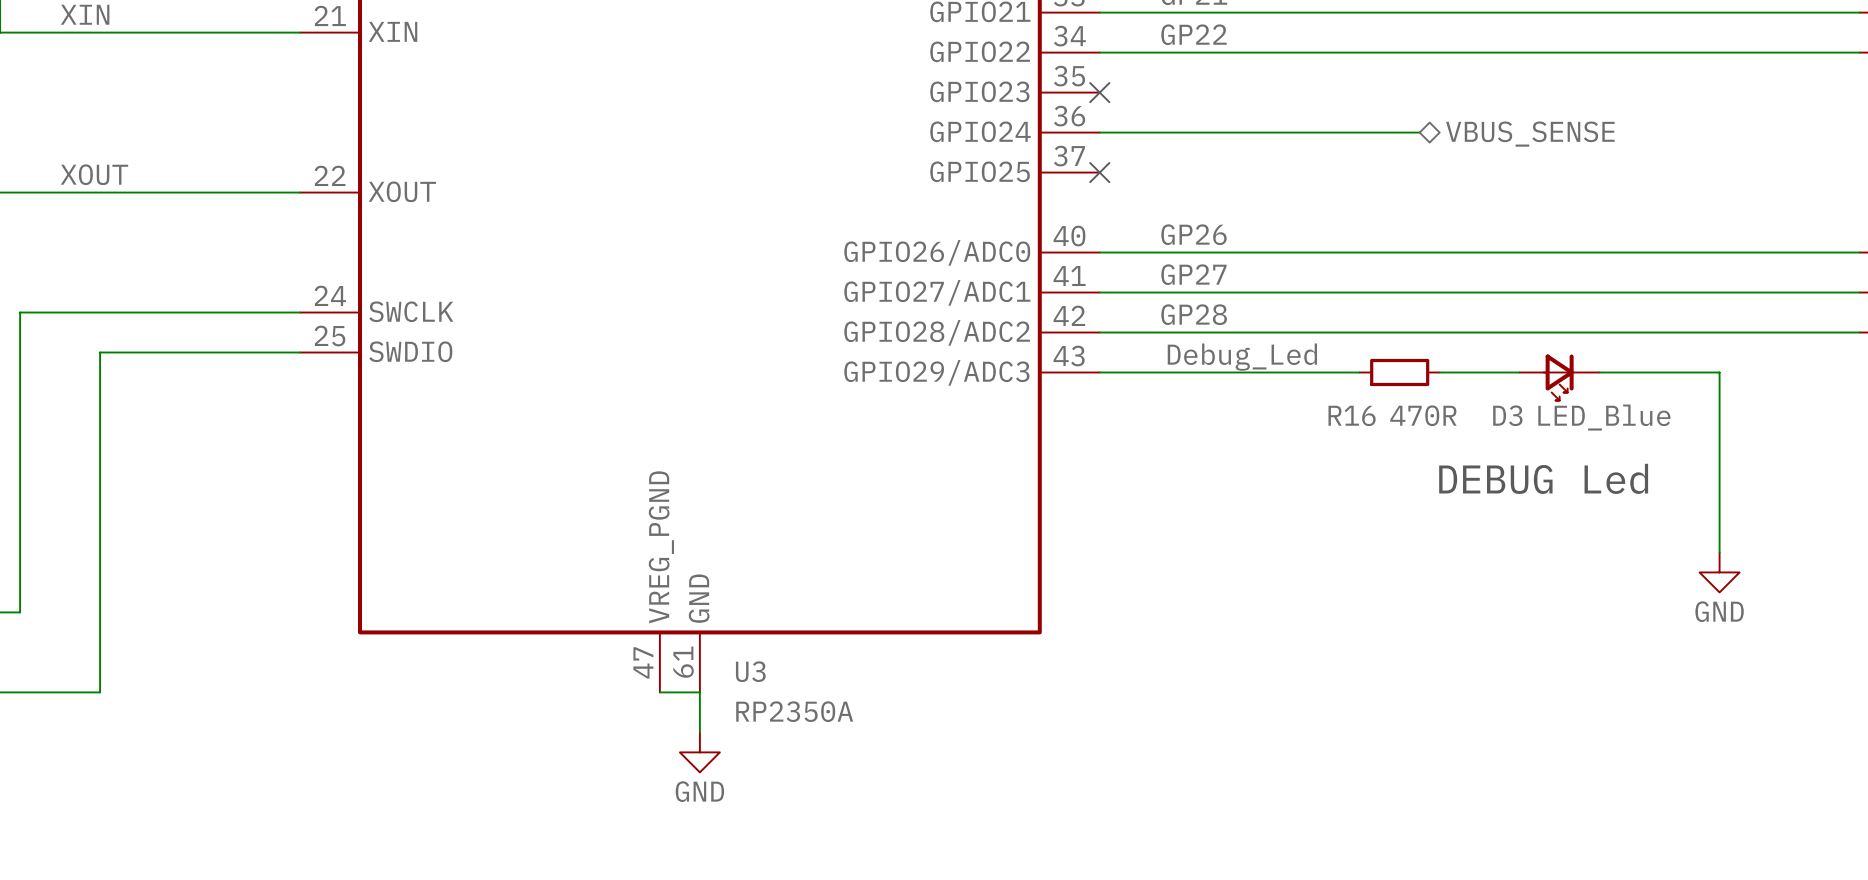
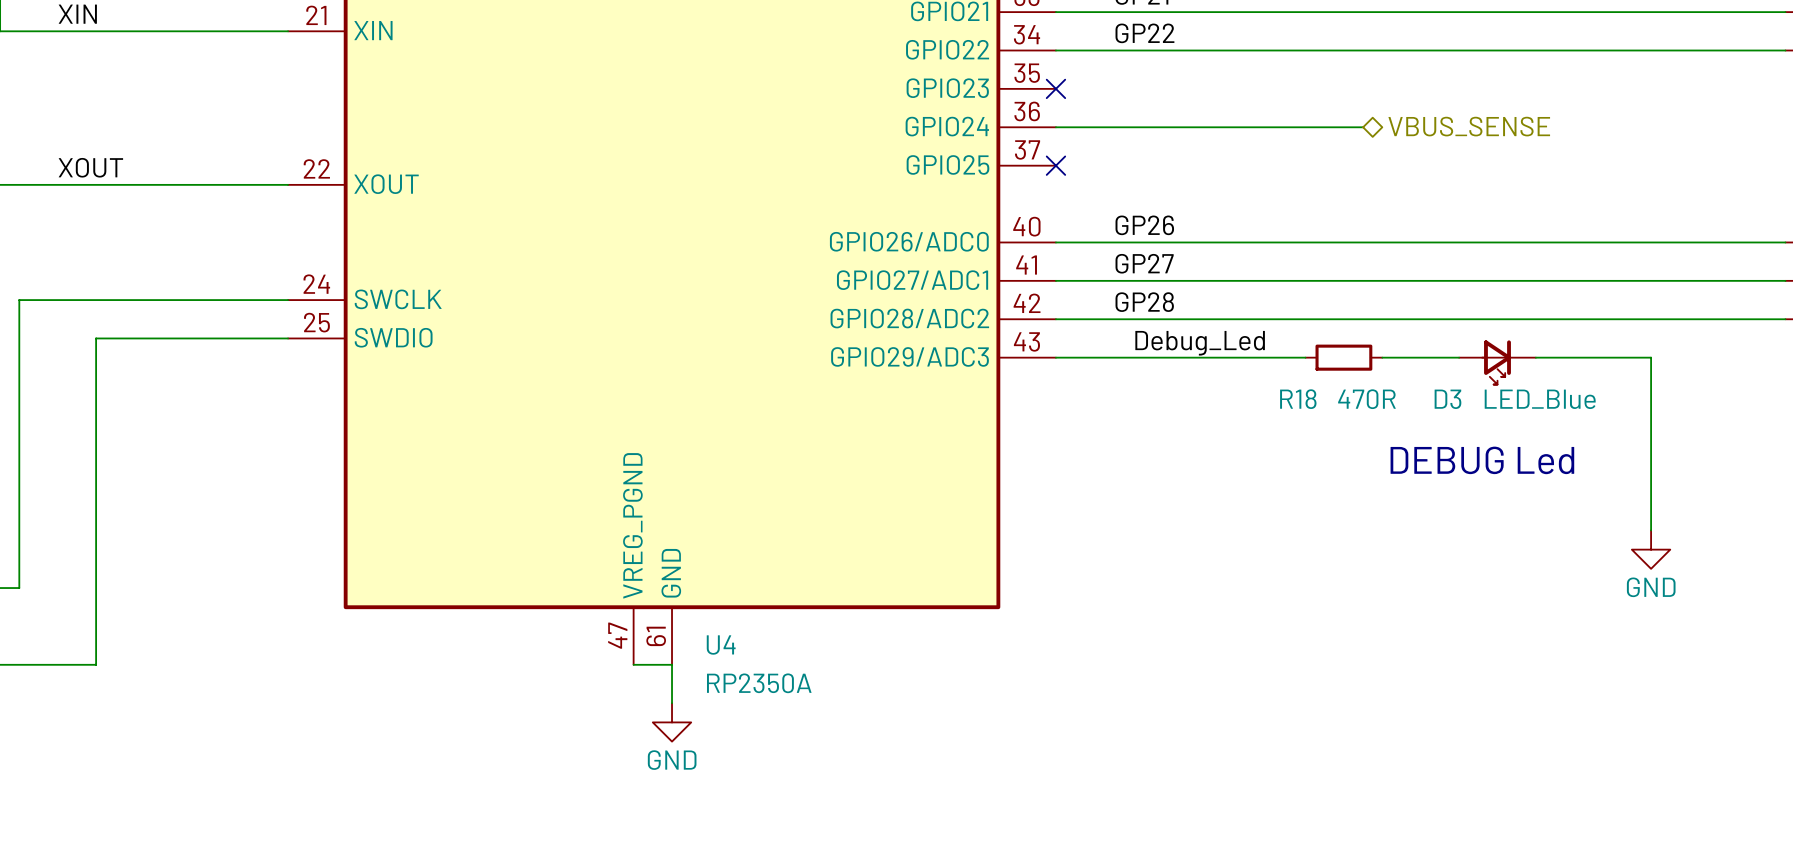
R16 name: R16 (1352, 415) -> R18 (1298, 399)
U3 name: U3 (750, 671) -> U4 (721, 645)

